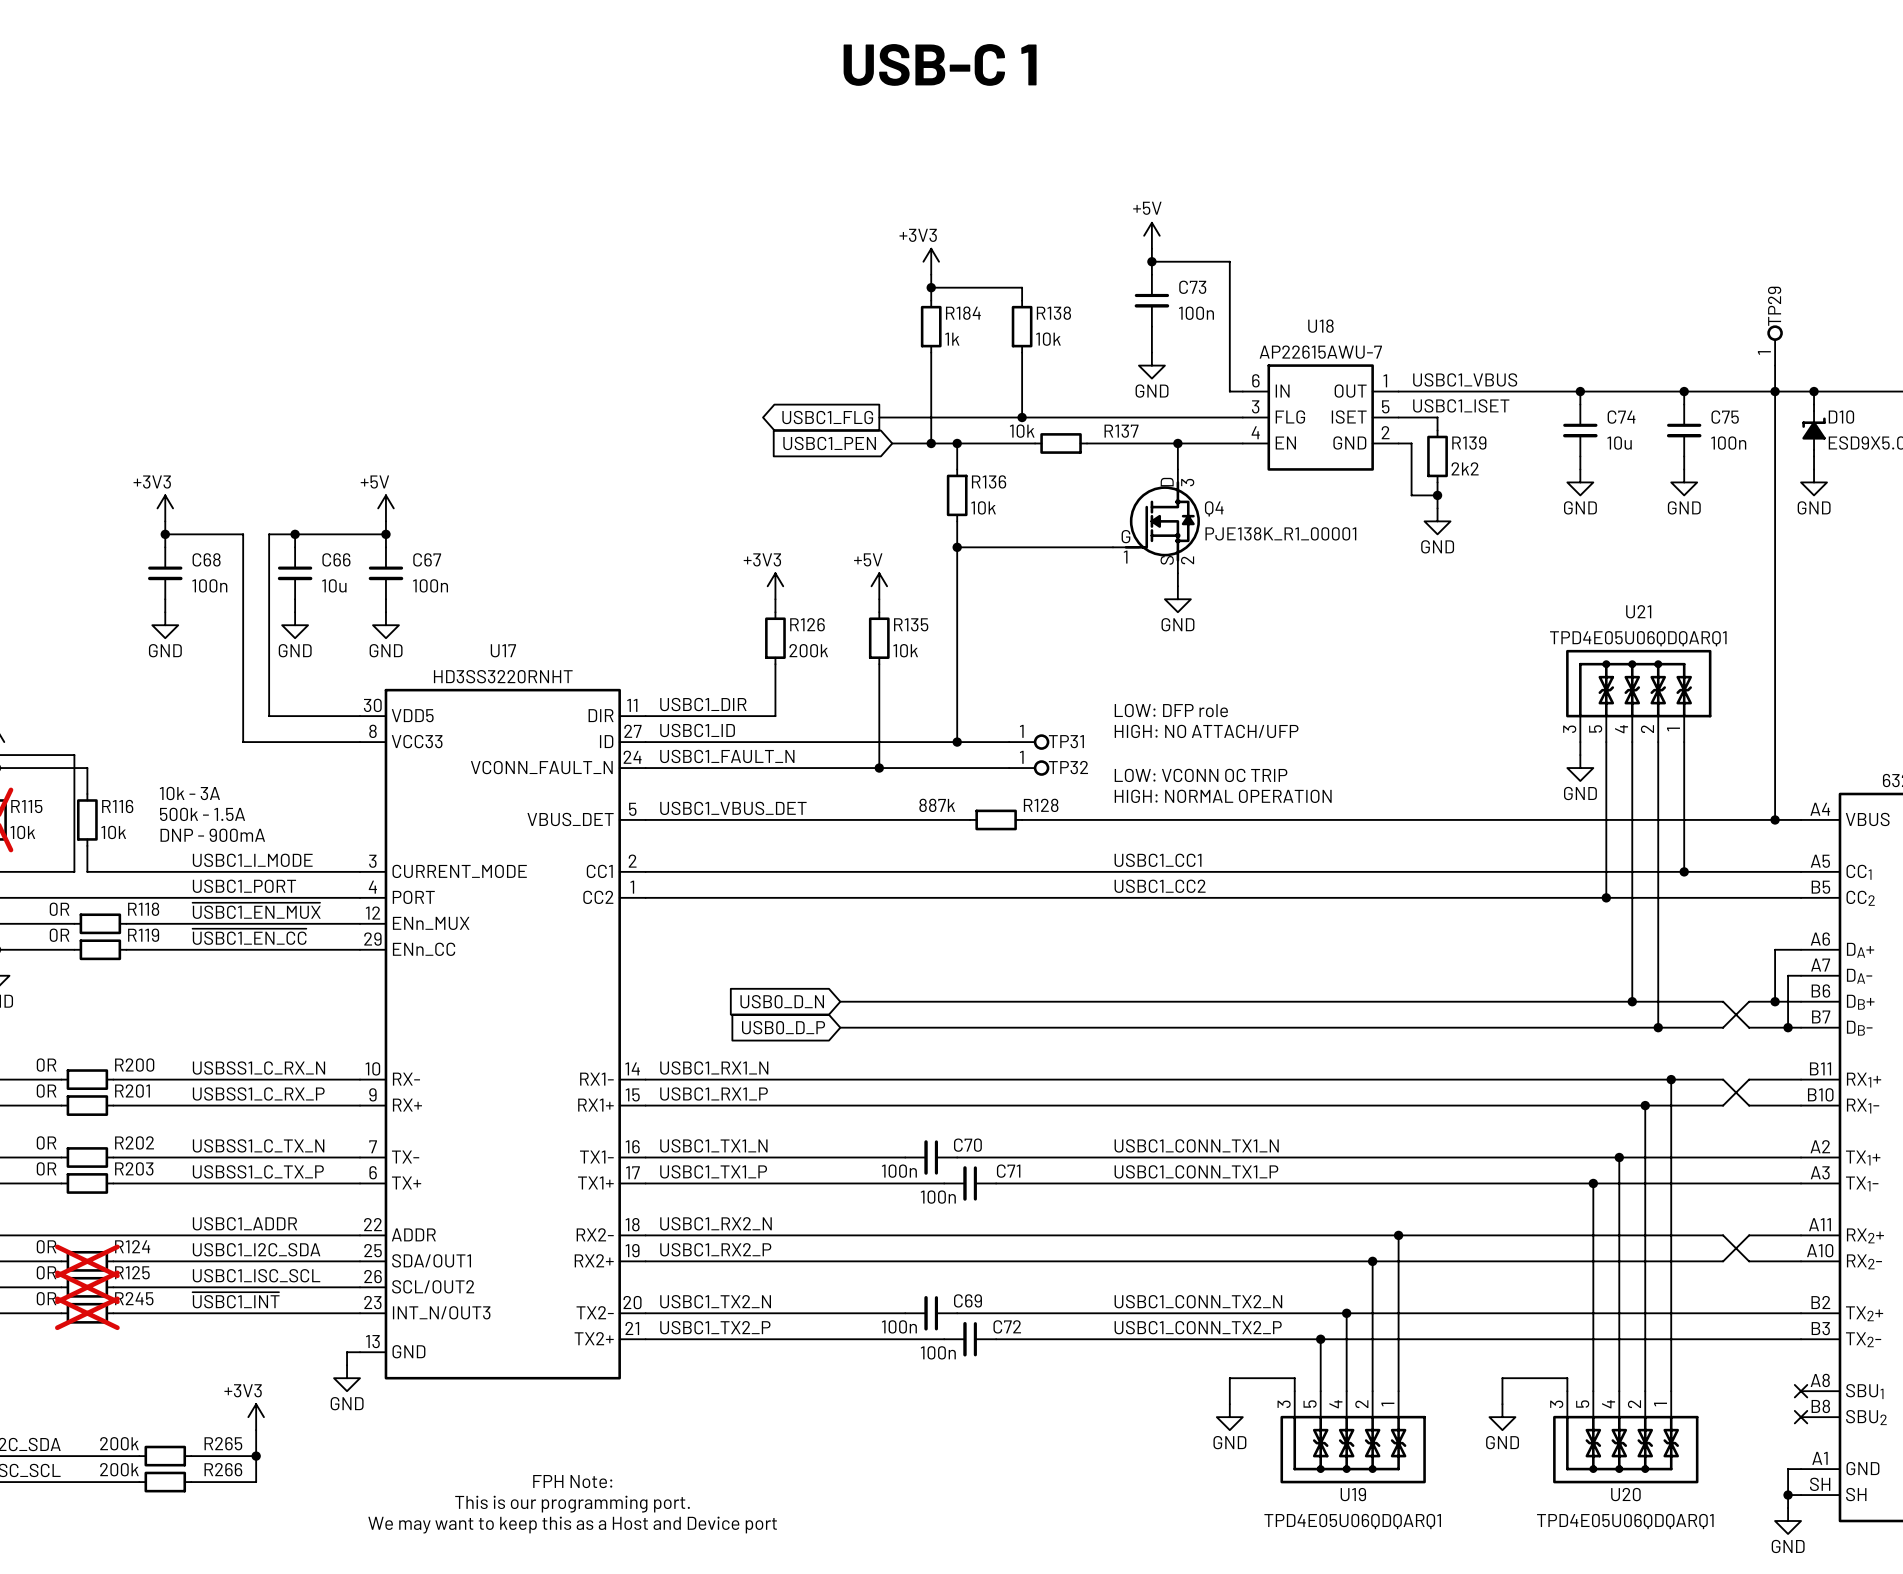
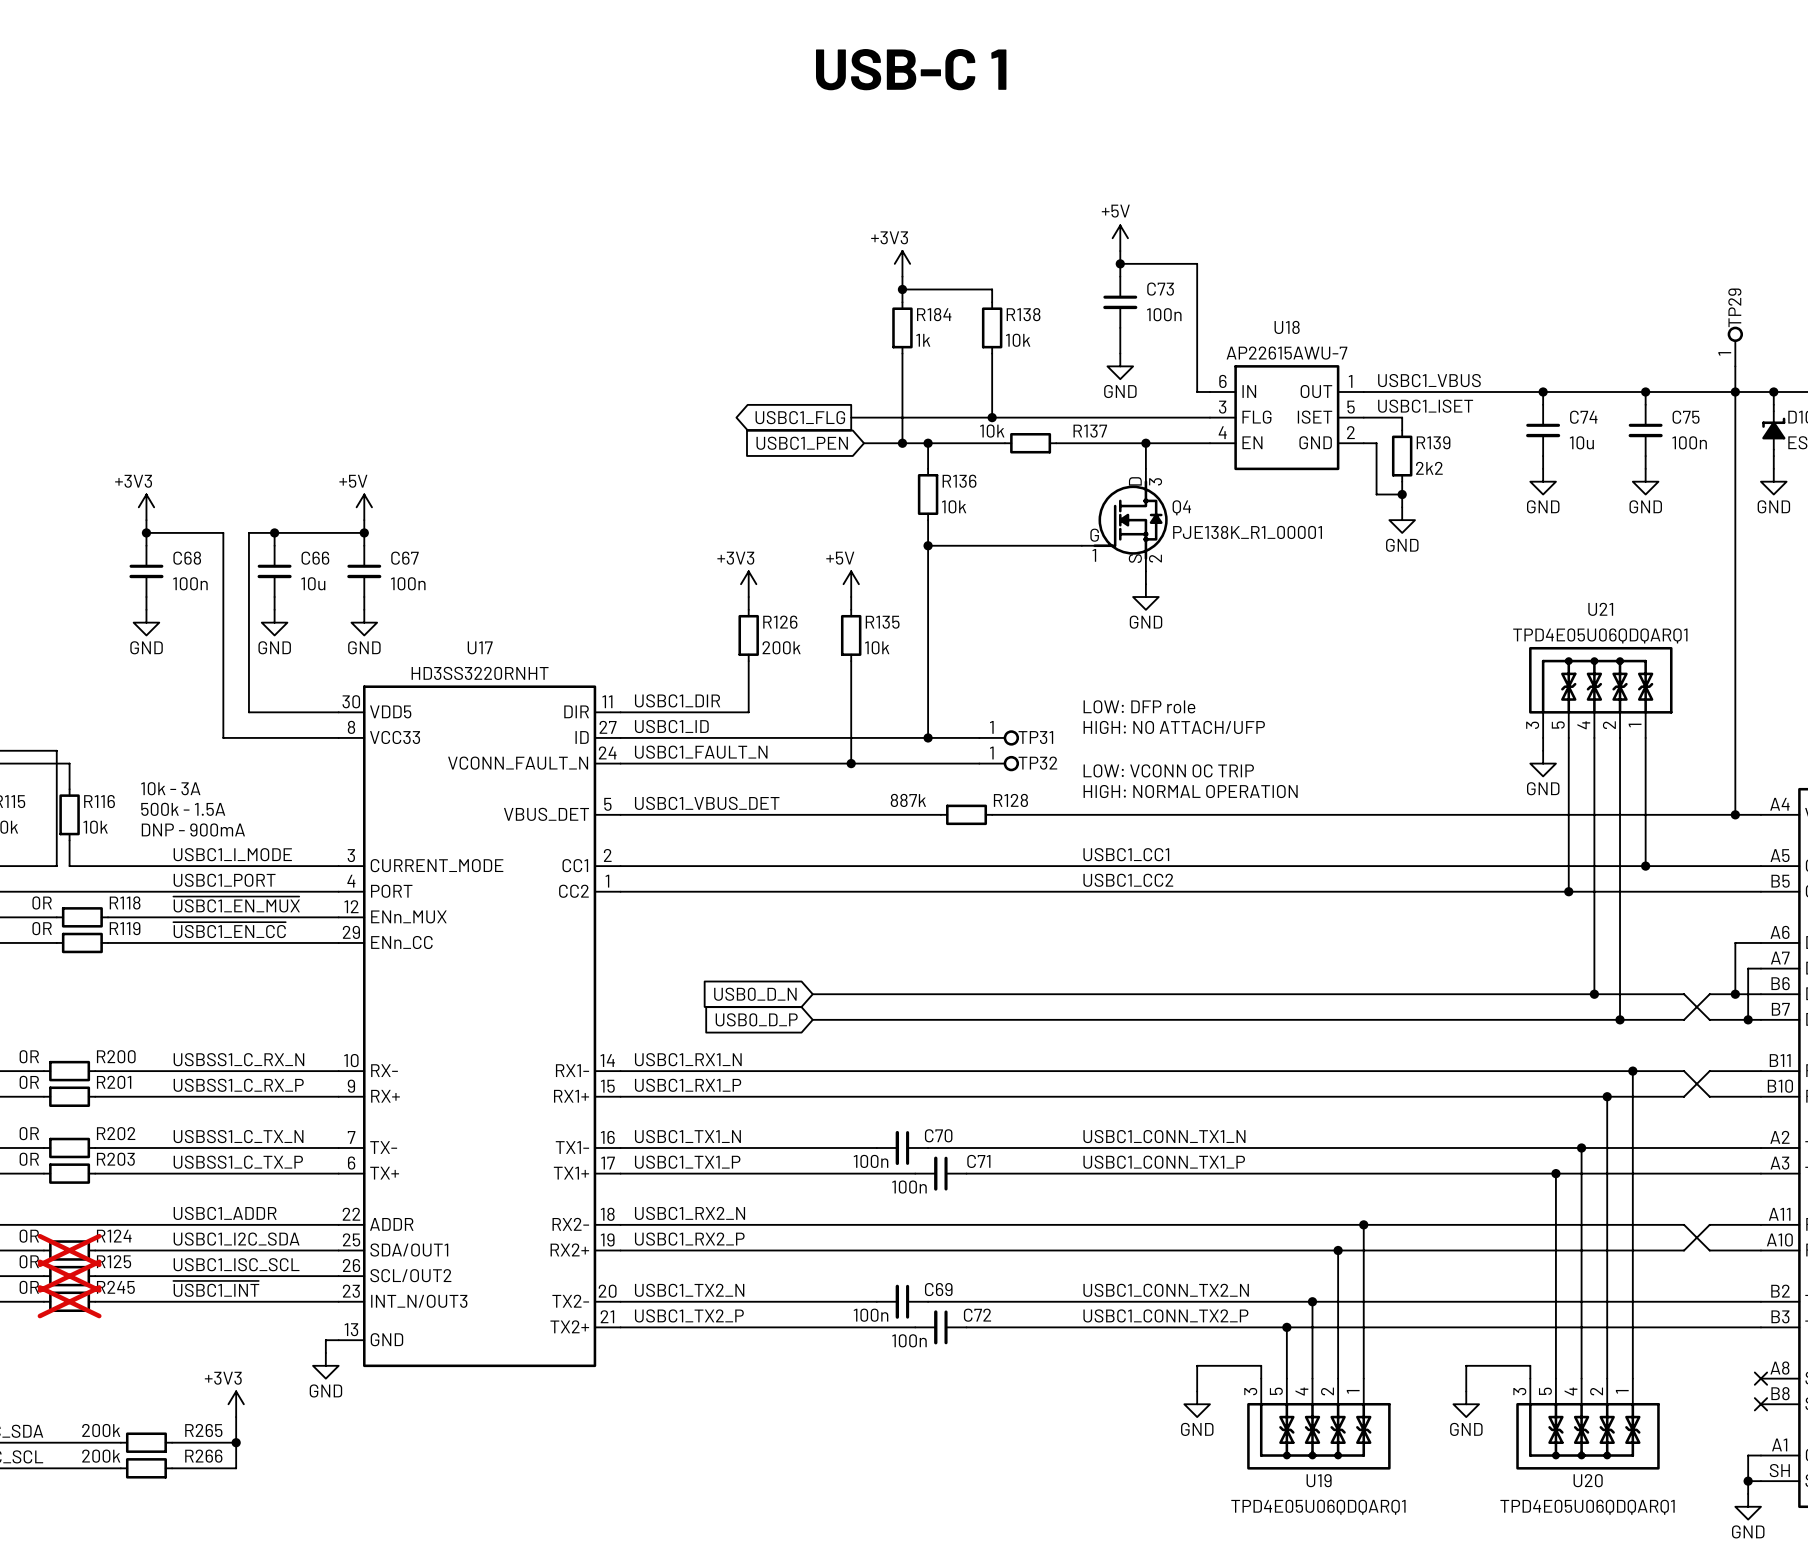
text: FPH Note: (572, 1481) -> none
text: This is our programming port. (572, 1504) -> none
text: We may want to keep this as a Host and Device port (572, 1525) -> none

